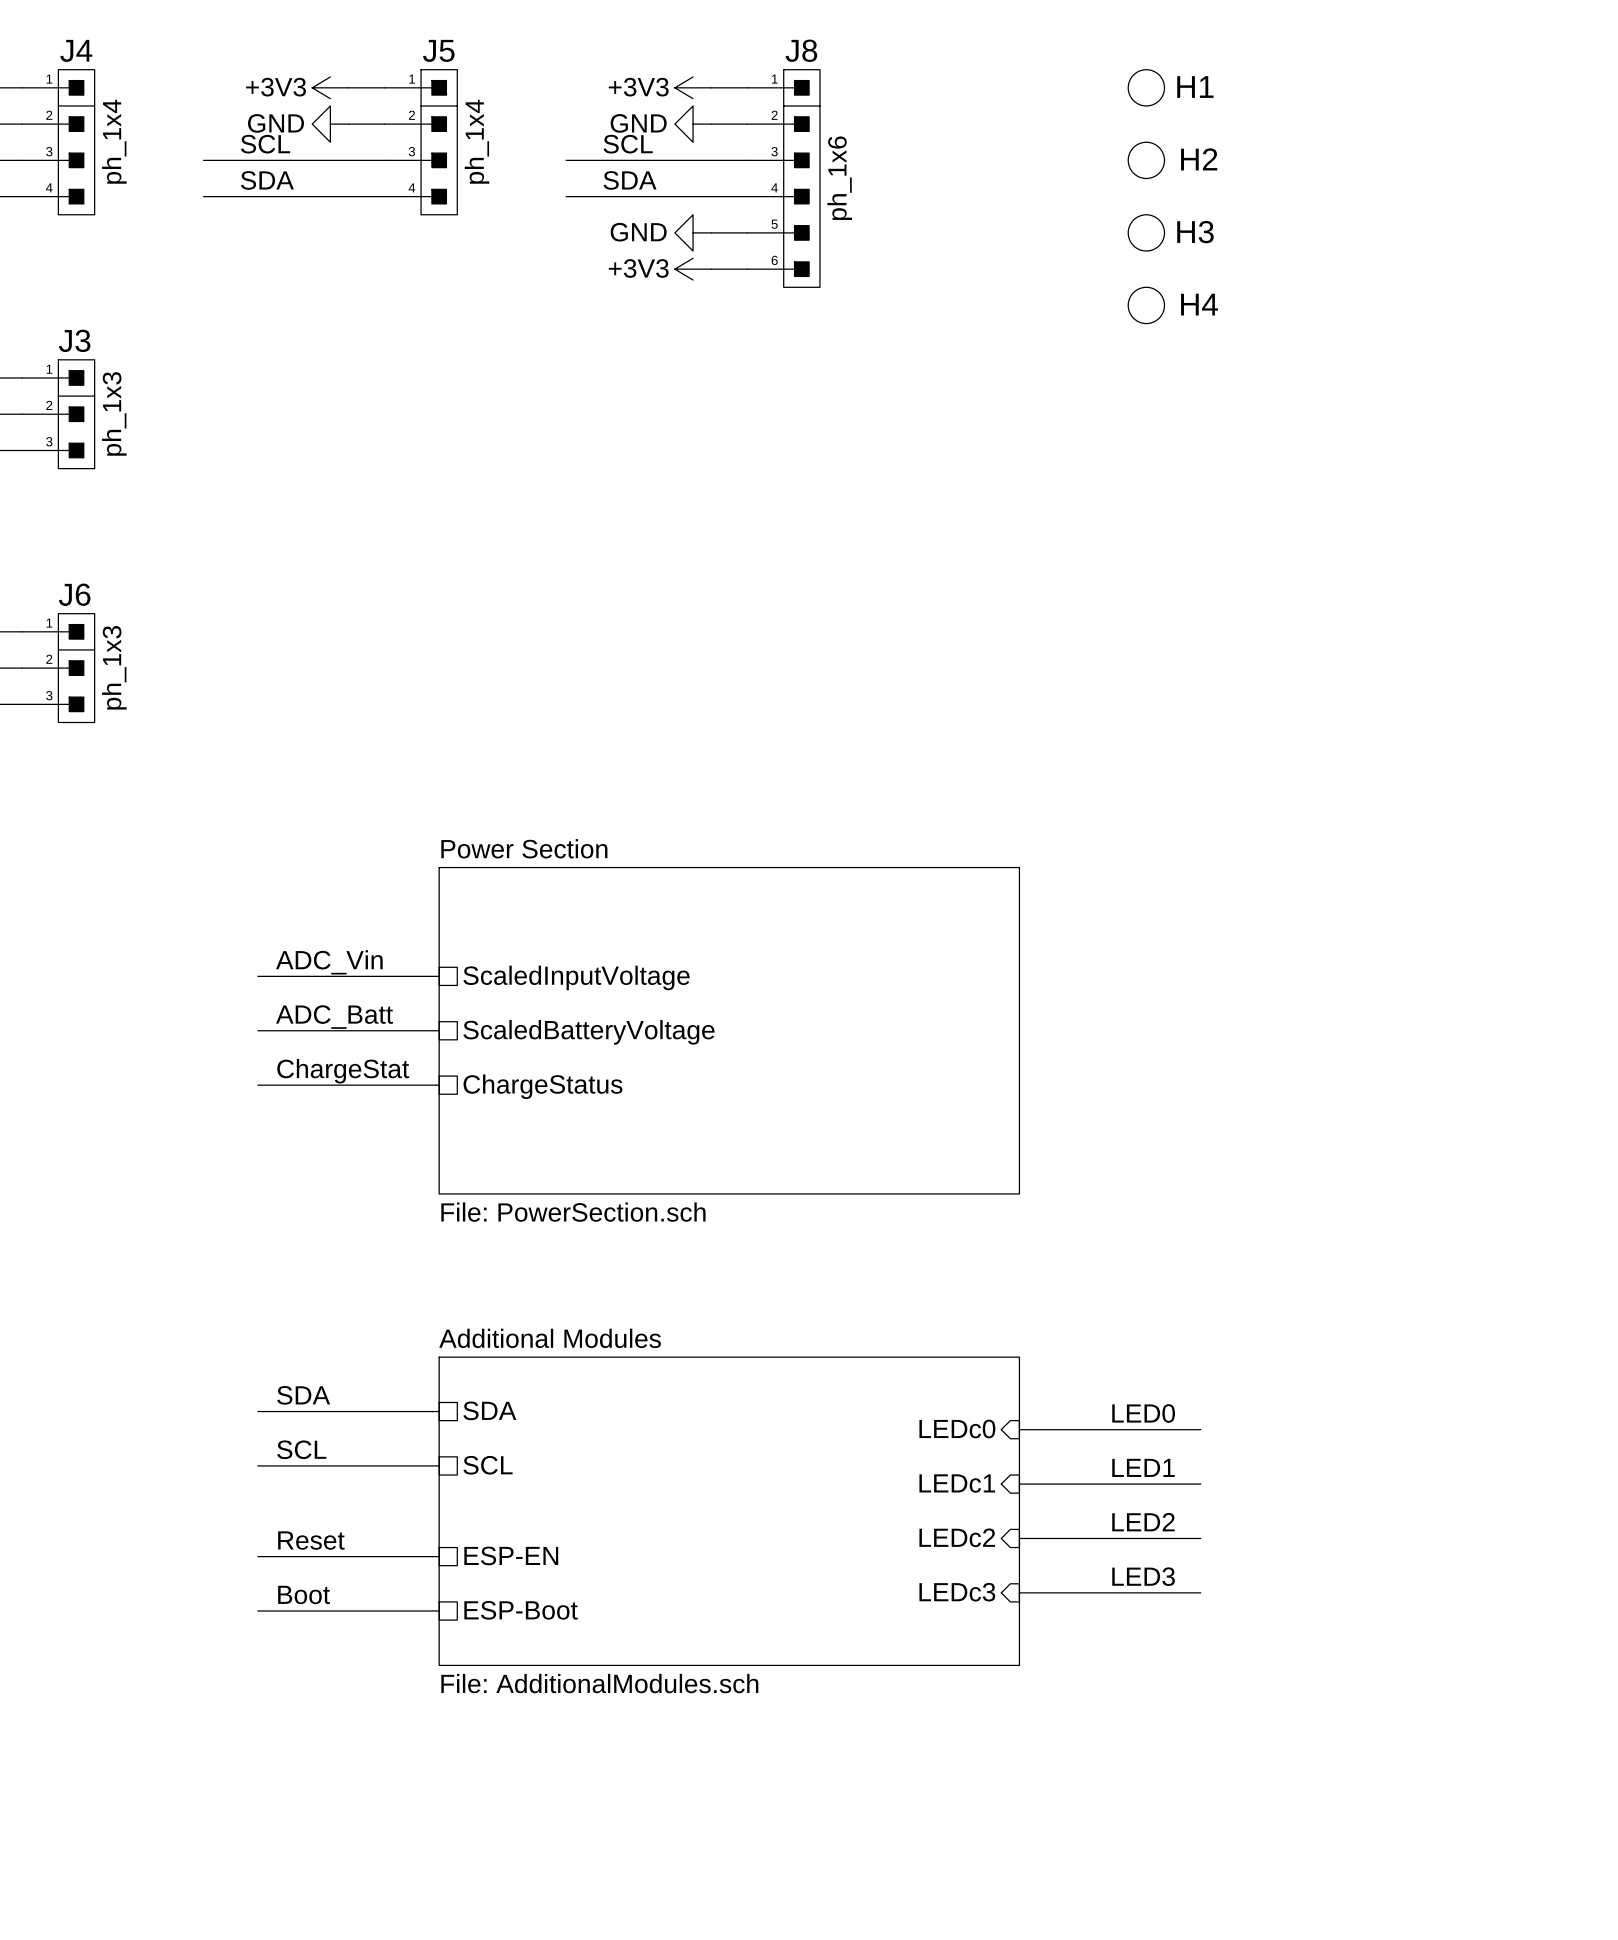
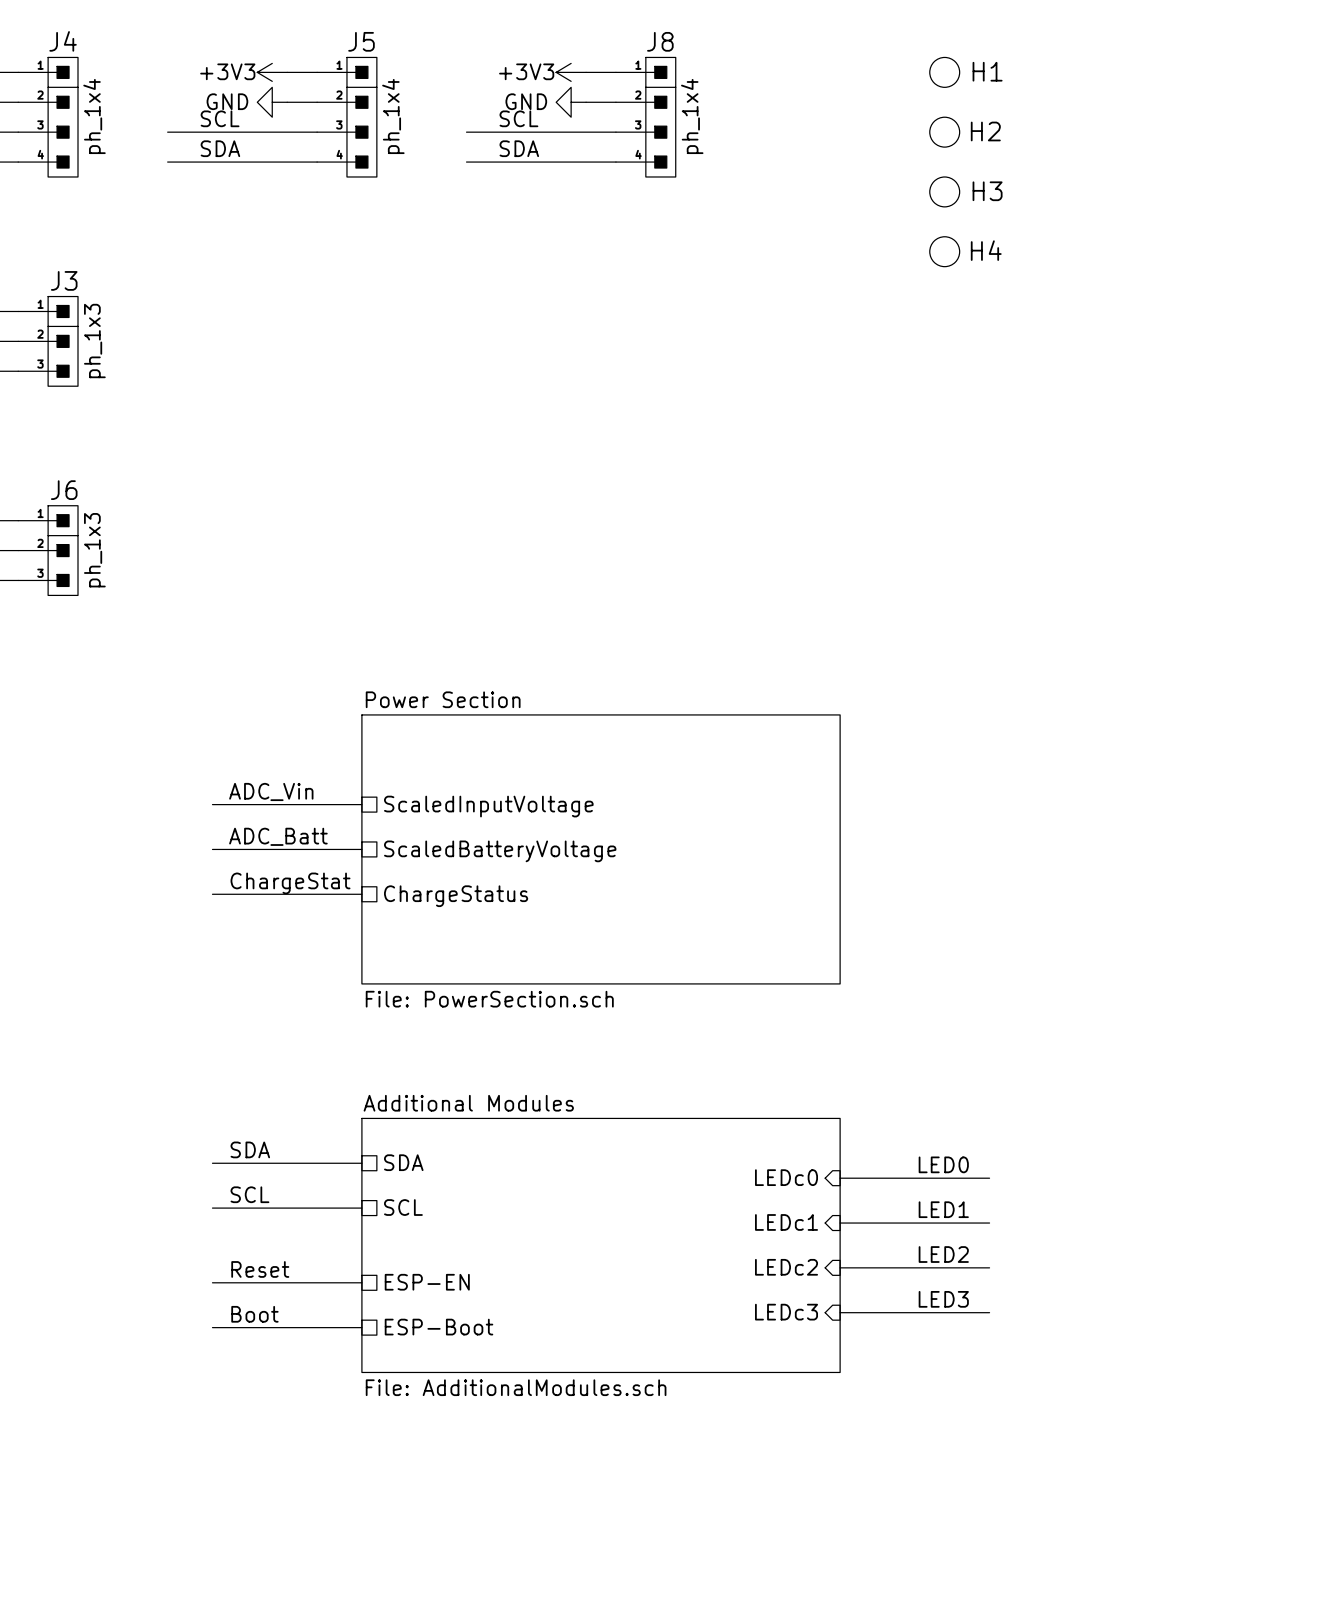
J8 symbol: [747, 69, 820, 288] -> [615, 57, 676, 177]
J8 value: ph_1x6 (839, 178) -> ph_1x4 (692, 116)
power symbol: GND (693, 232) -> none
wire: (711, 232) (747, 232) -> none
power symbol: +3V3 (693, 269) -> none
wire: (711, 269) (747, 269) -> none

